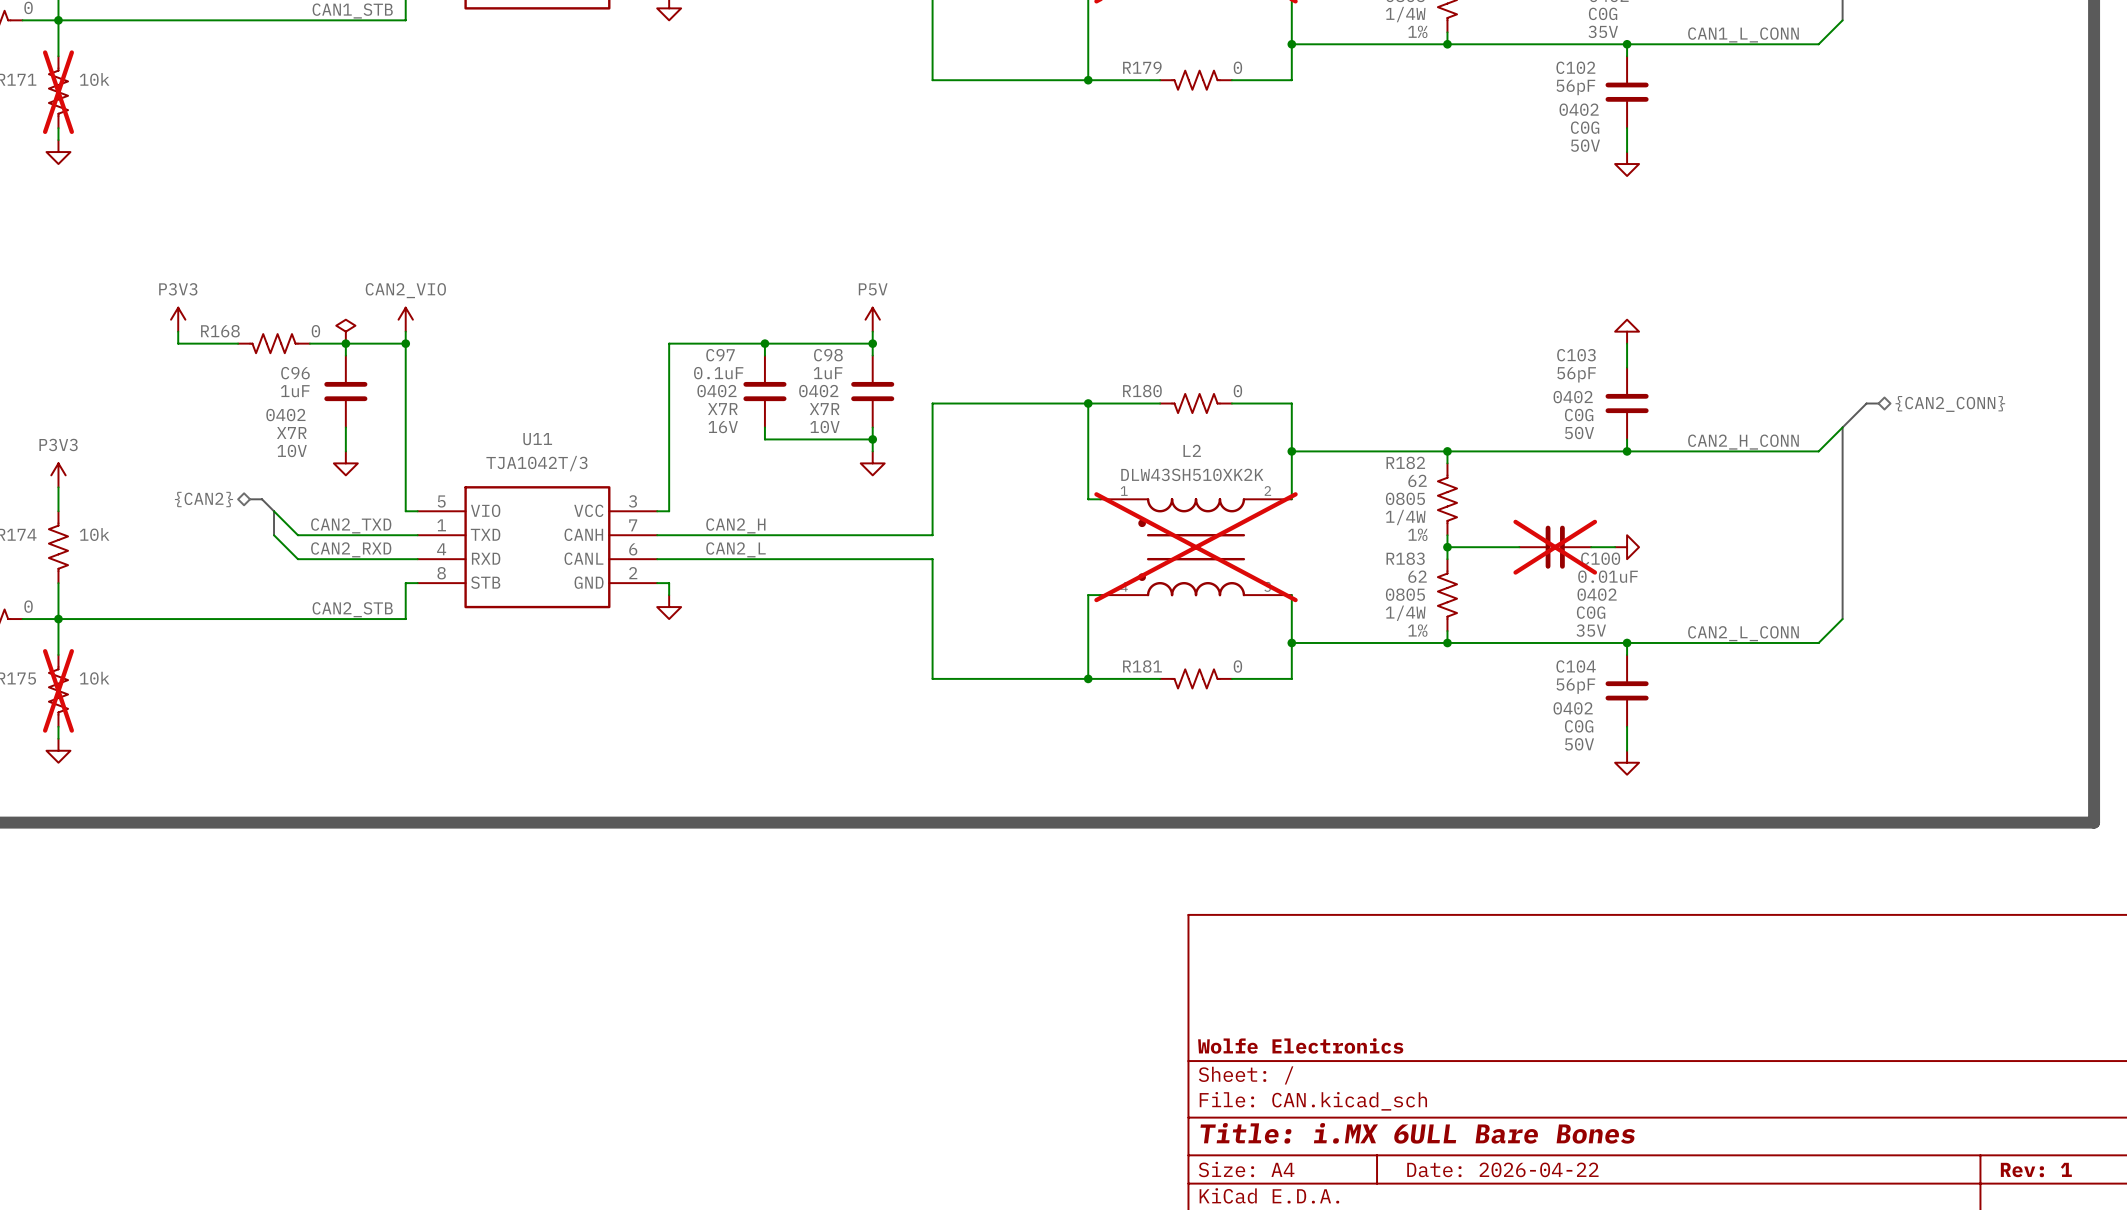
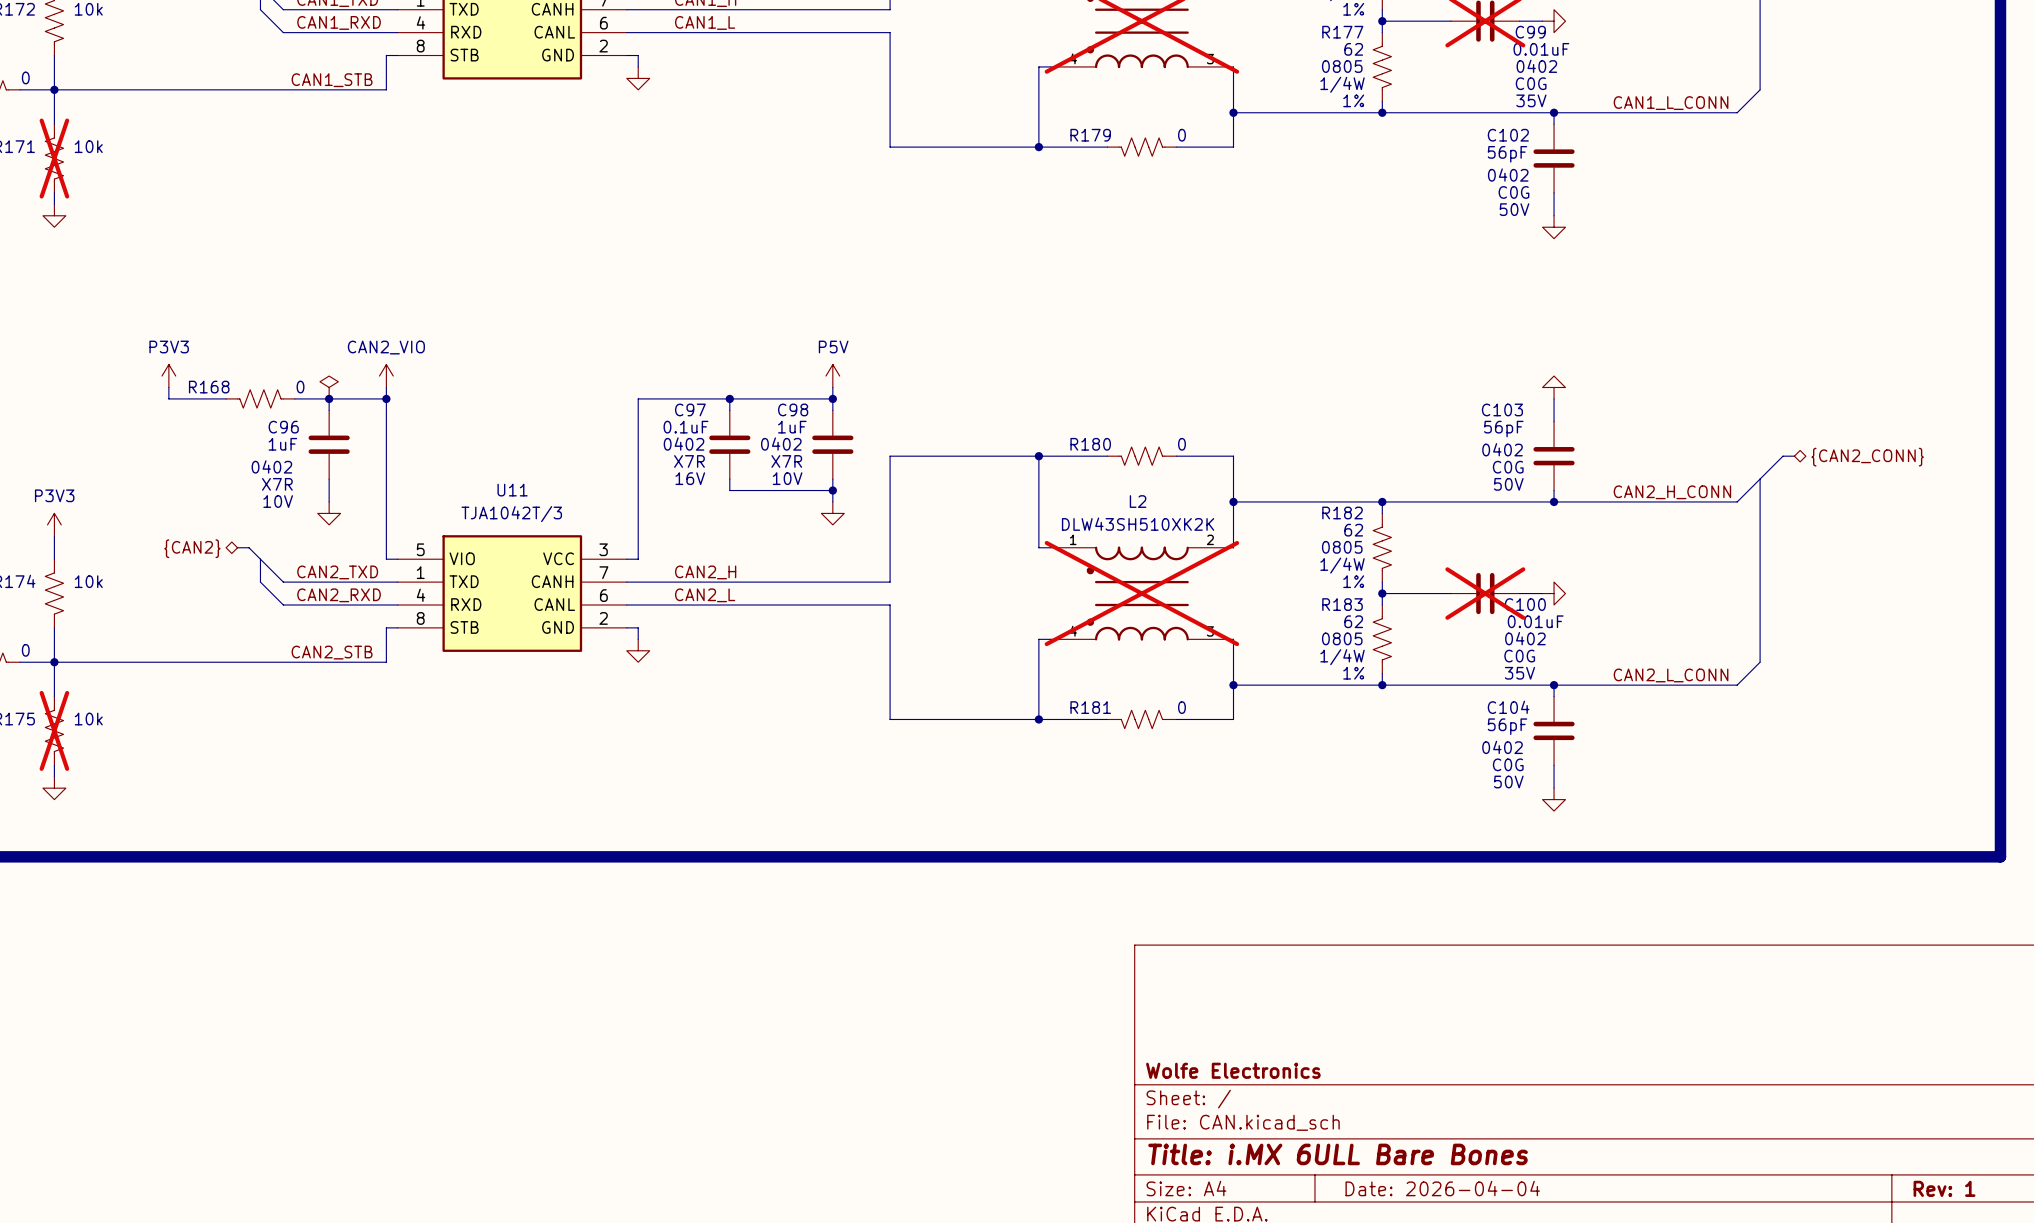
title block: Date: 2026-04-22 (1502, 1169) -> Date: 2026-04-04 (1442, 1188)

